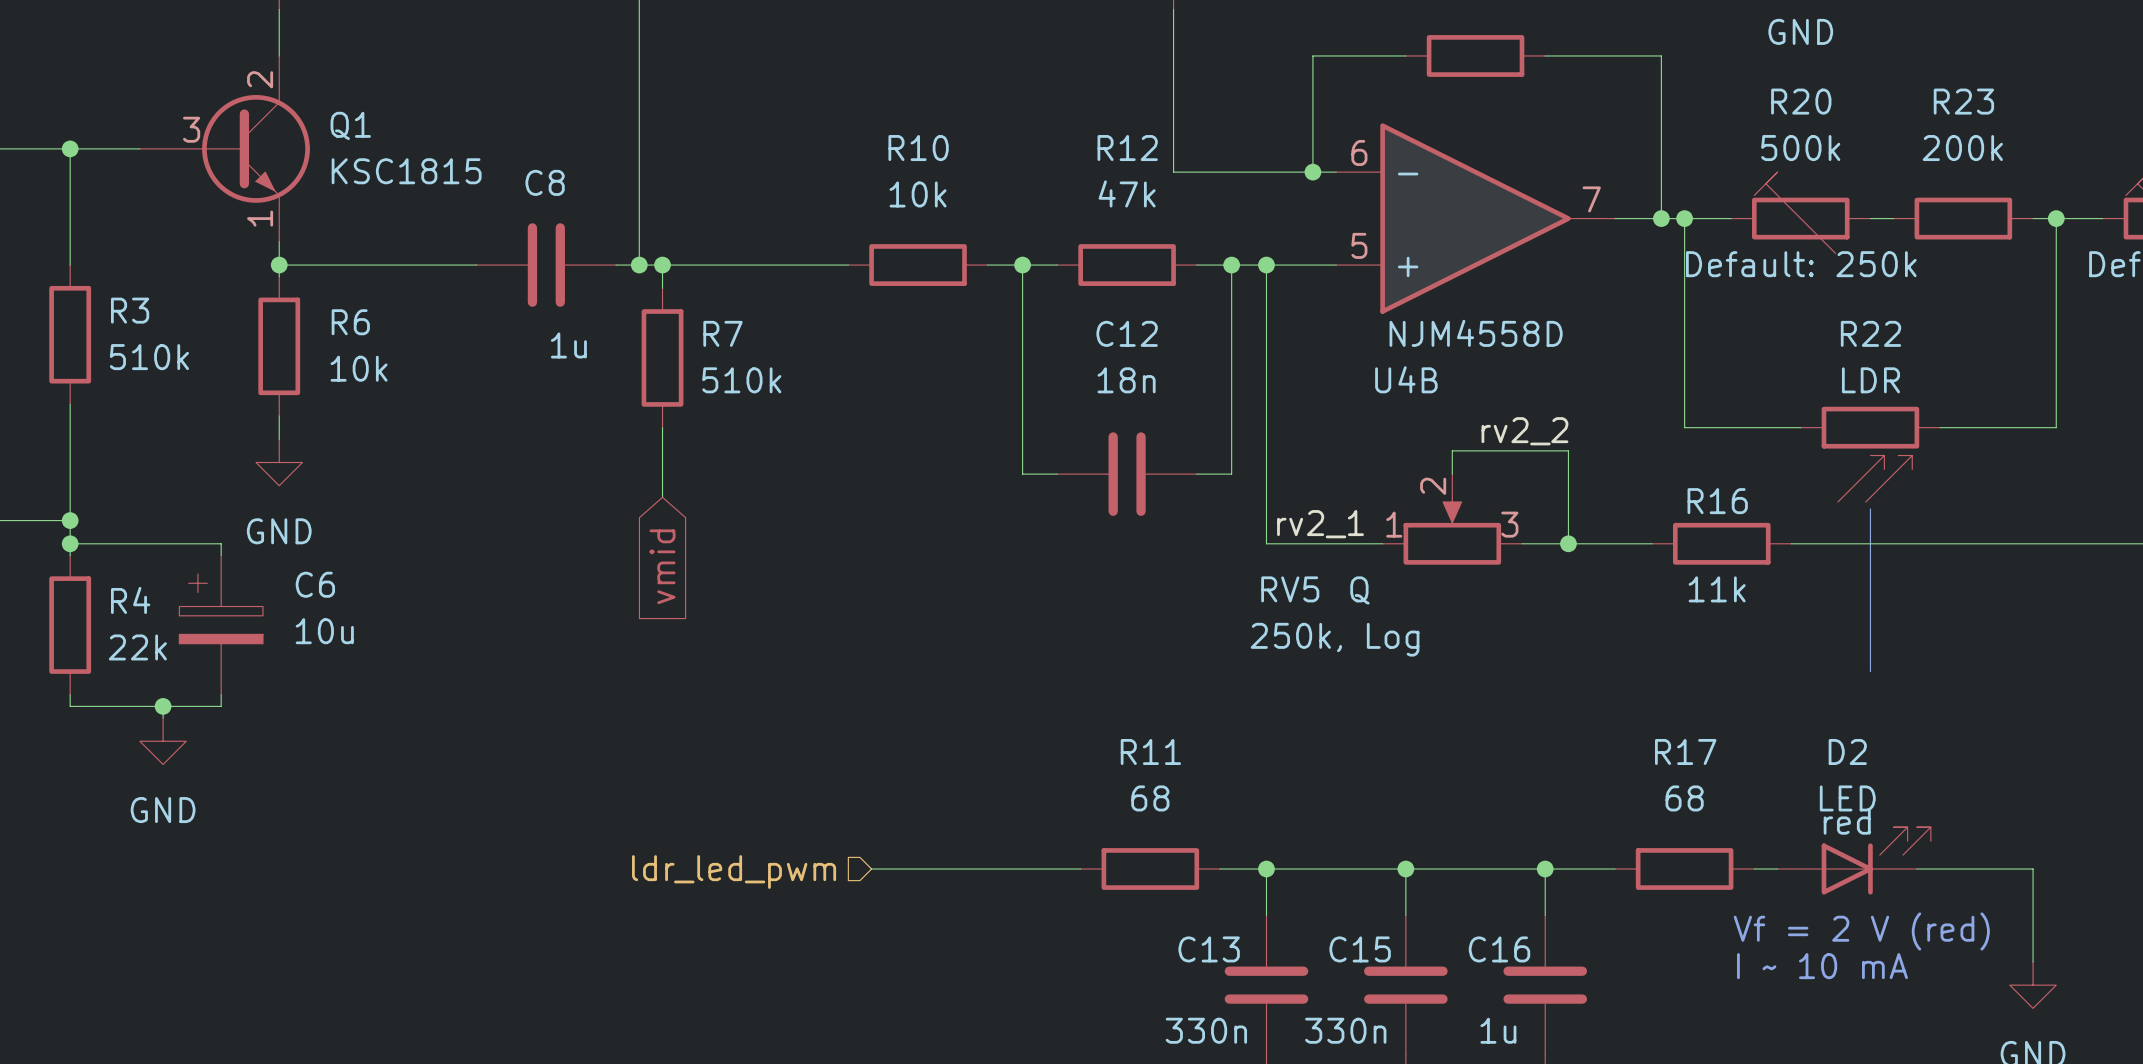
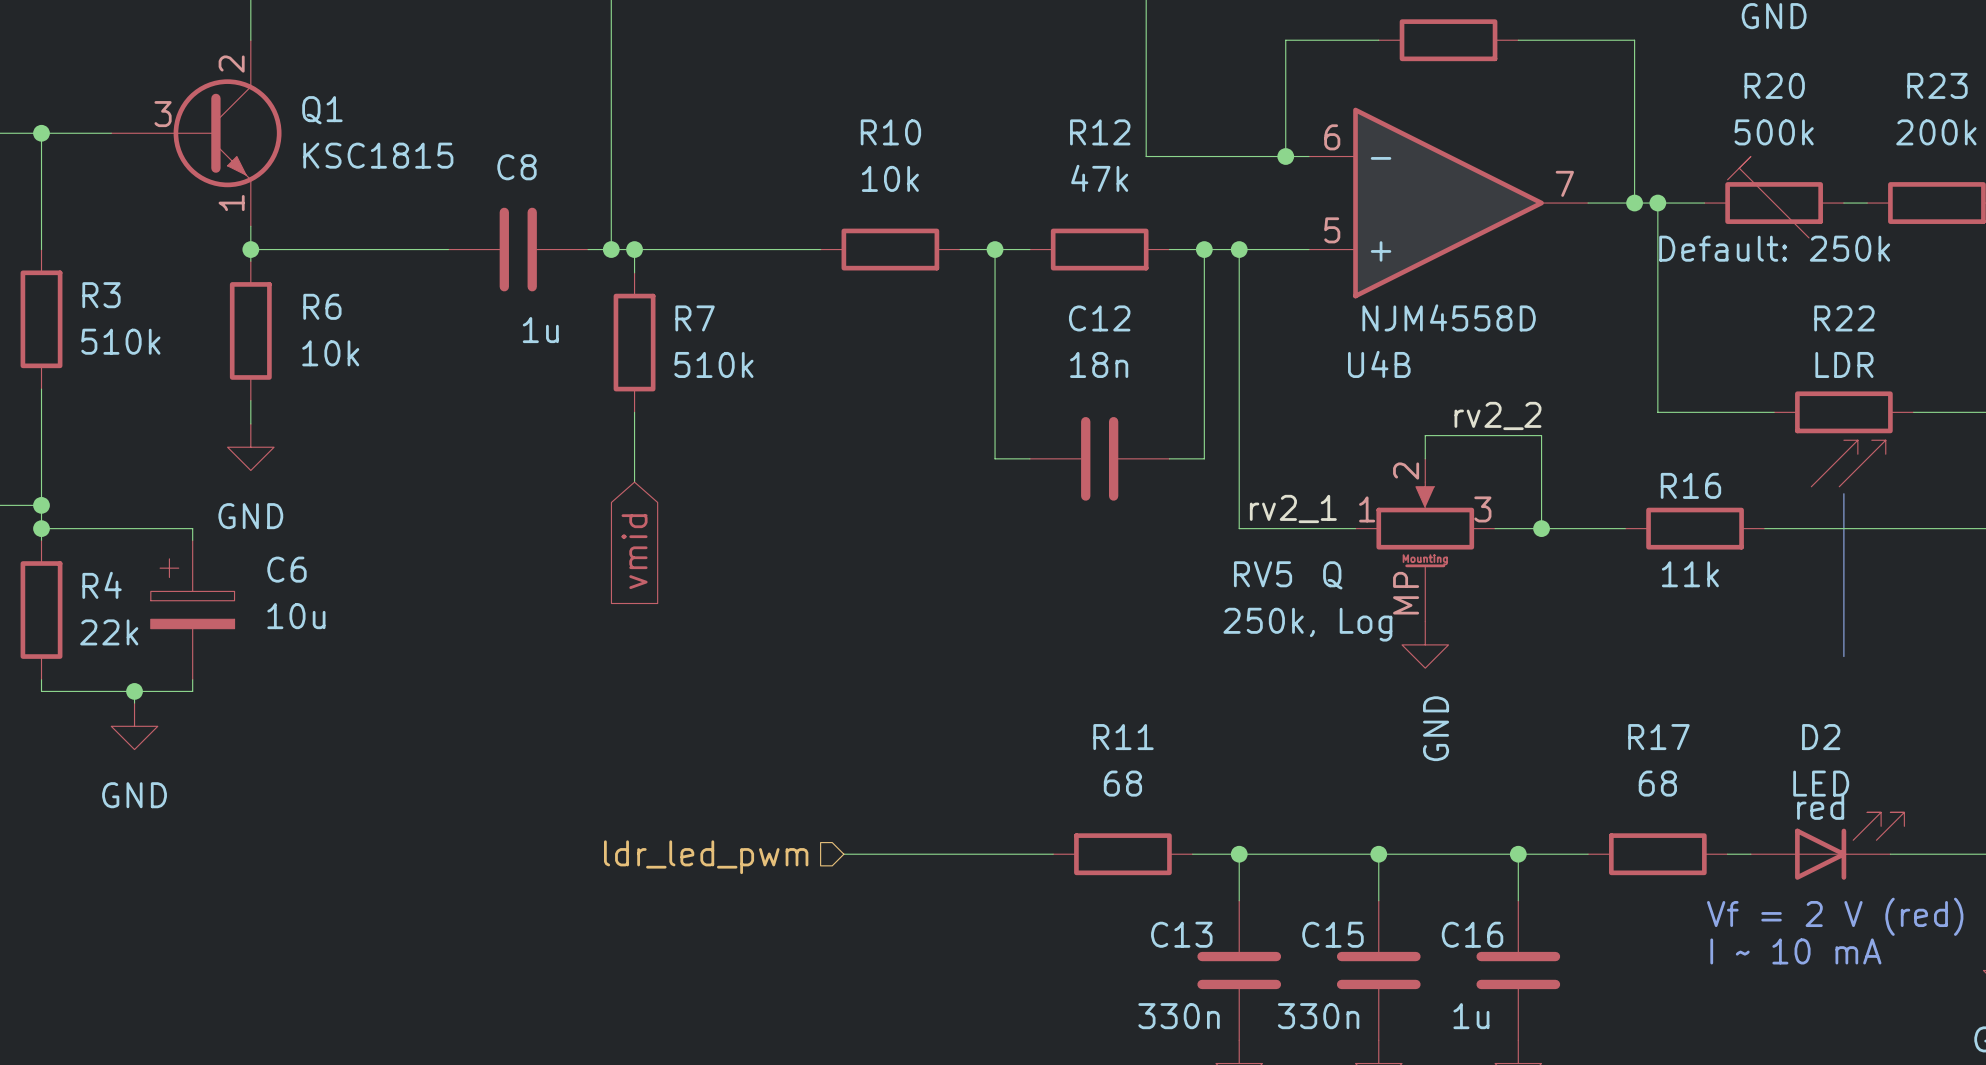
RV5 symbol: [1382, 474, 1523, 565] -> [1355, 458, 1496, 622]
power symbol: none -> GND (1425, 644)

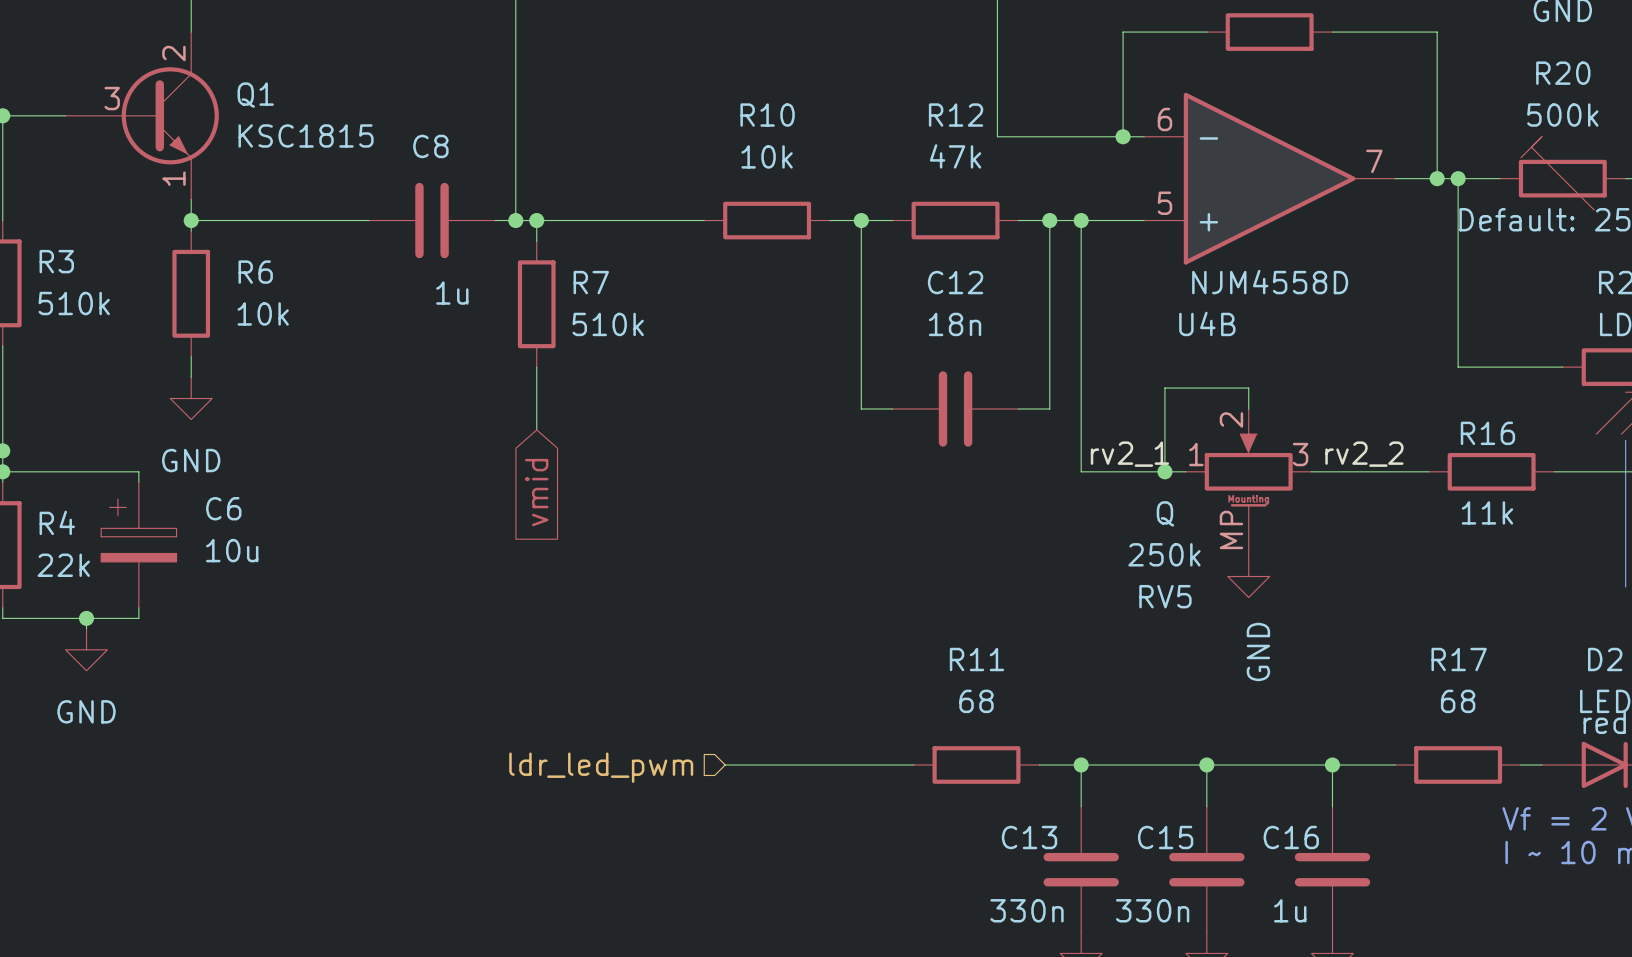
label position: rv2_2 (1497, 415) -> rv2_2 (1364, 454)
wire: (1425, 435) (1541, 435) (1541, 528) -> (1248, 388) (1164, 388) (1164, 471)
junction: none -> (1164, 471)
junction: (1541, 528) -> none
RV5 name position: RV5 (1263, 574) -> RV5 (1165, 596)
RV5 value: 250k, Log (1307, 624) -> 250k (1164, 554)

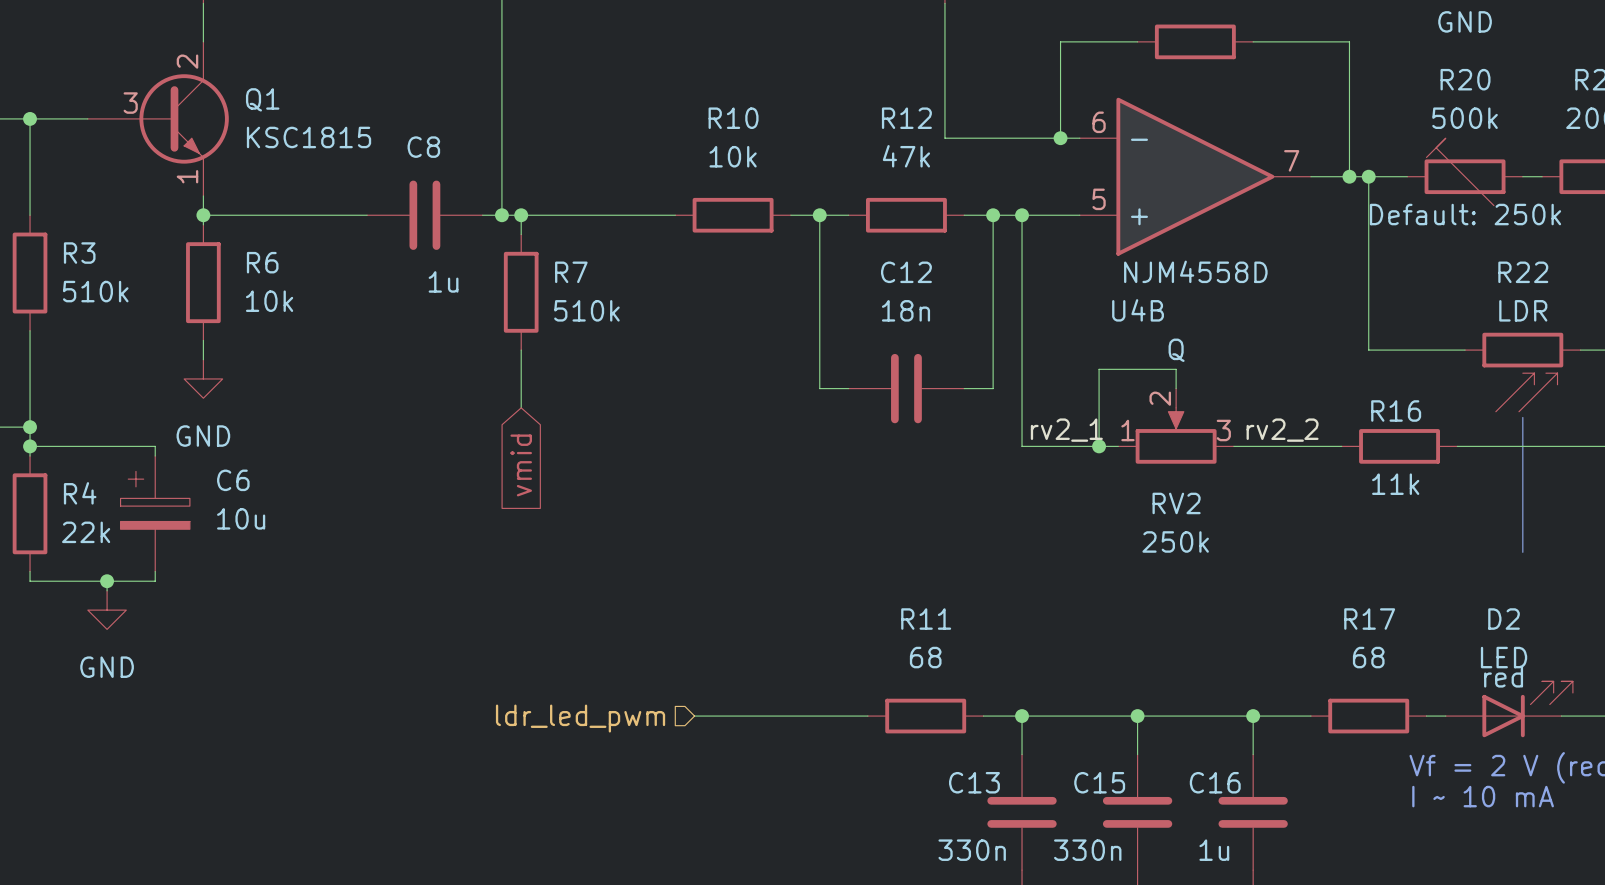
RV2: none -> 250k (1176, 426)
RV5: 250k (1248, 482) -> none
power symbol: GND (1248, 576) -> none

